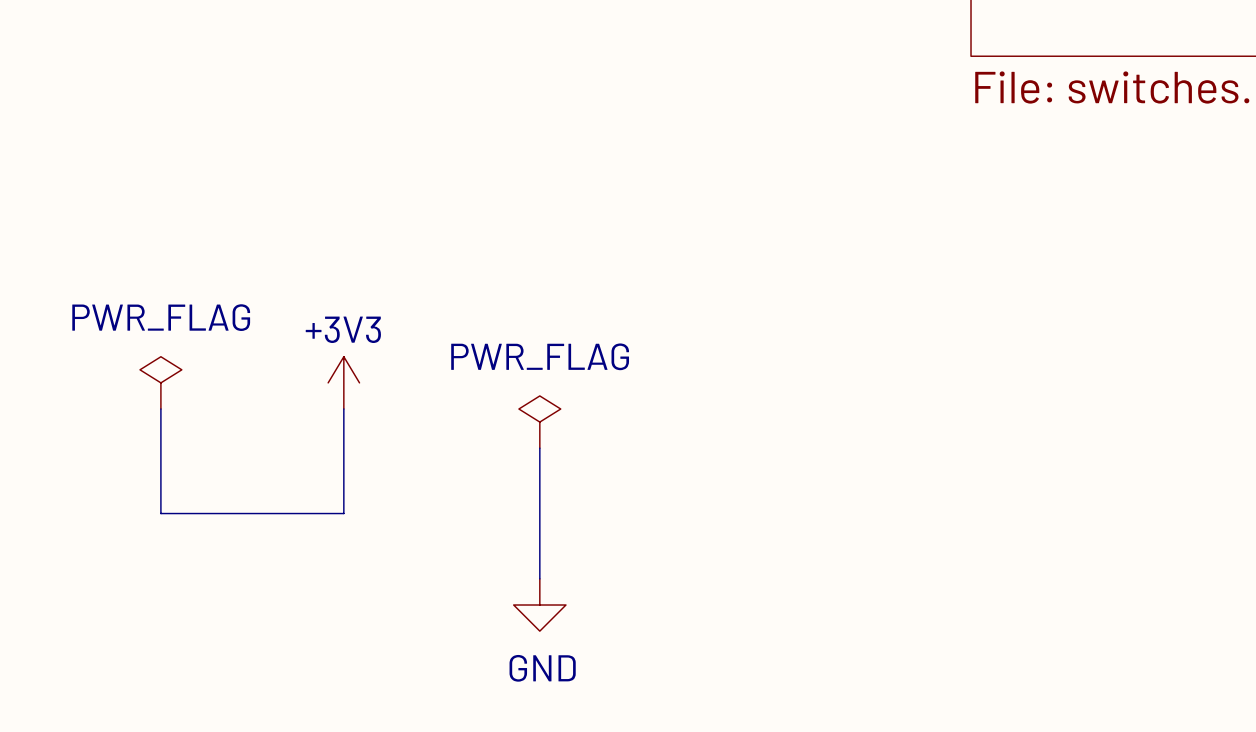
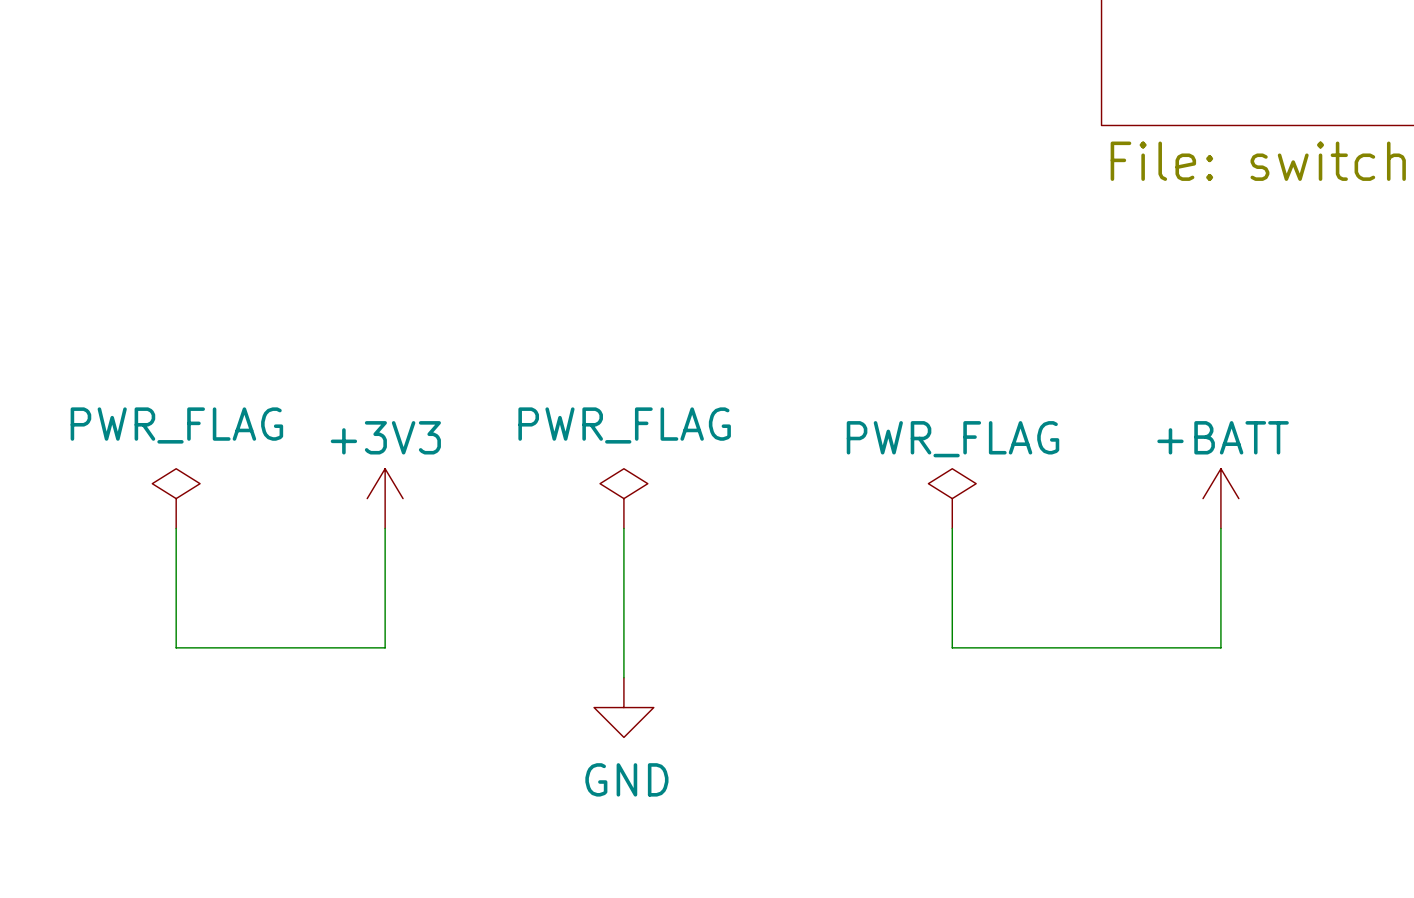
power symbol: none -> PWR_FLAG (952, 498)
power symbol: none -> +BATT (1220, 498)
wire: none -> (952, 528) (952, 647) (1220, 647) (1220, 528)
power symbol position: PWR_FLAG (539, 422) -> PWR_FLAG (623, 498)
wire: (539, 448) (539, 578) -> (623, 528) (623, 677)
power symbol position: GND (539, 605) -> GND (623, 707)

